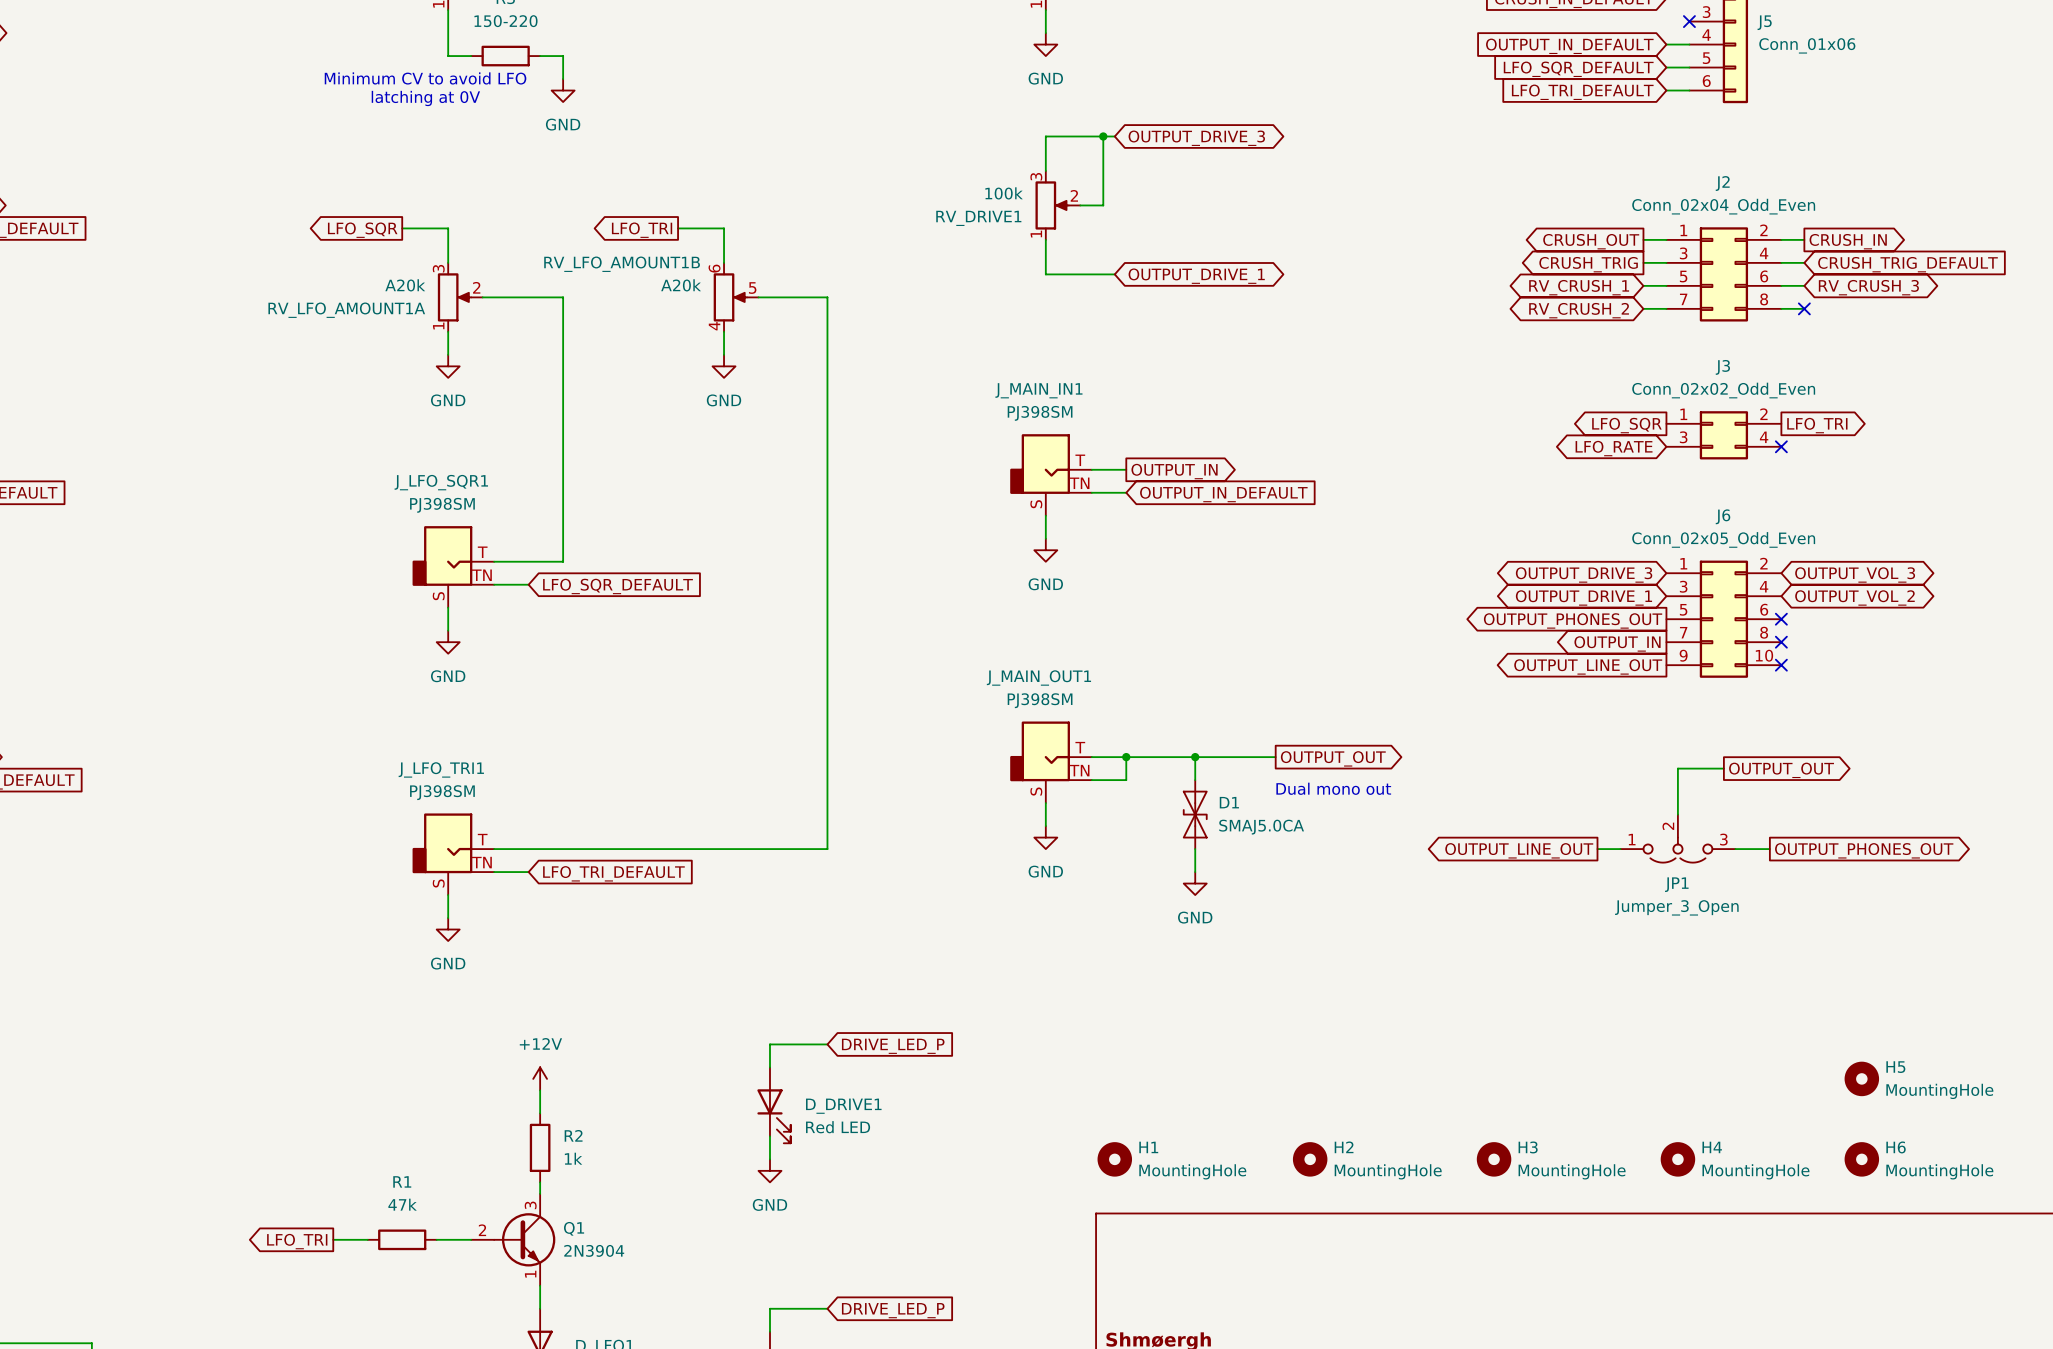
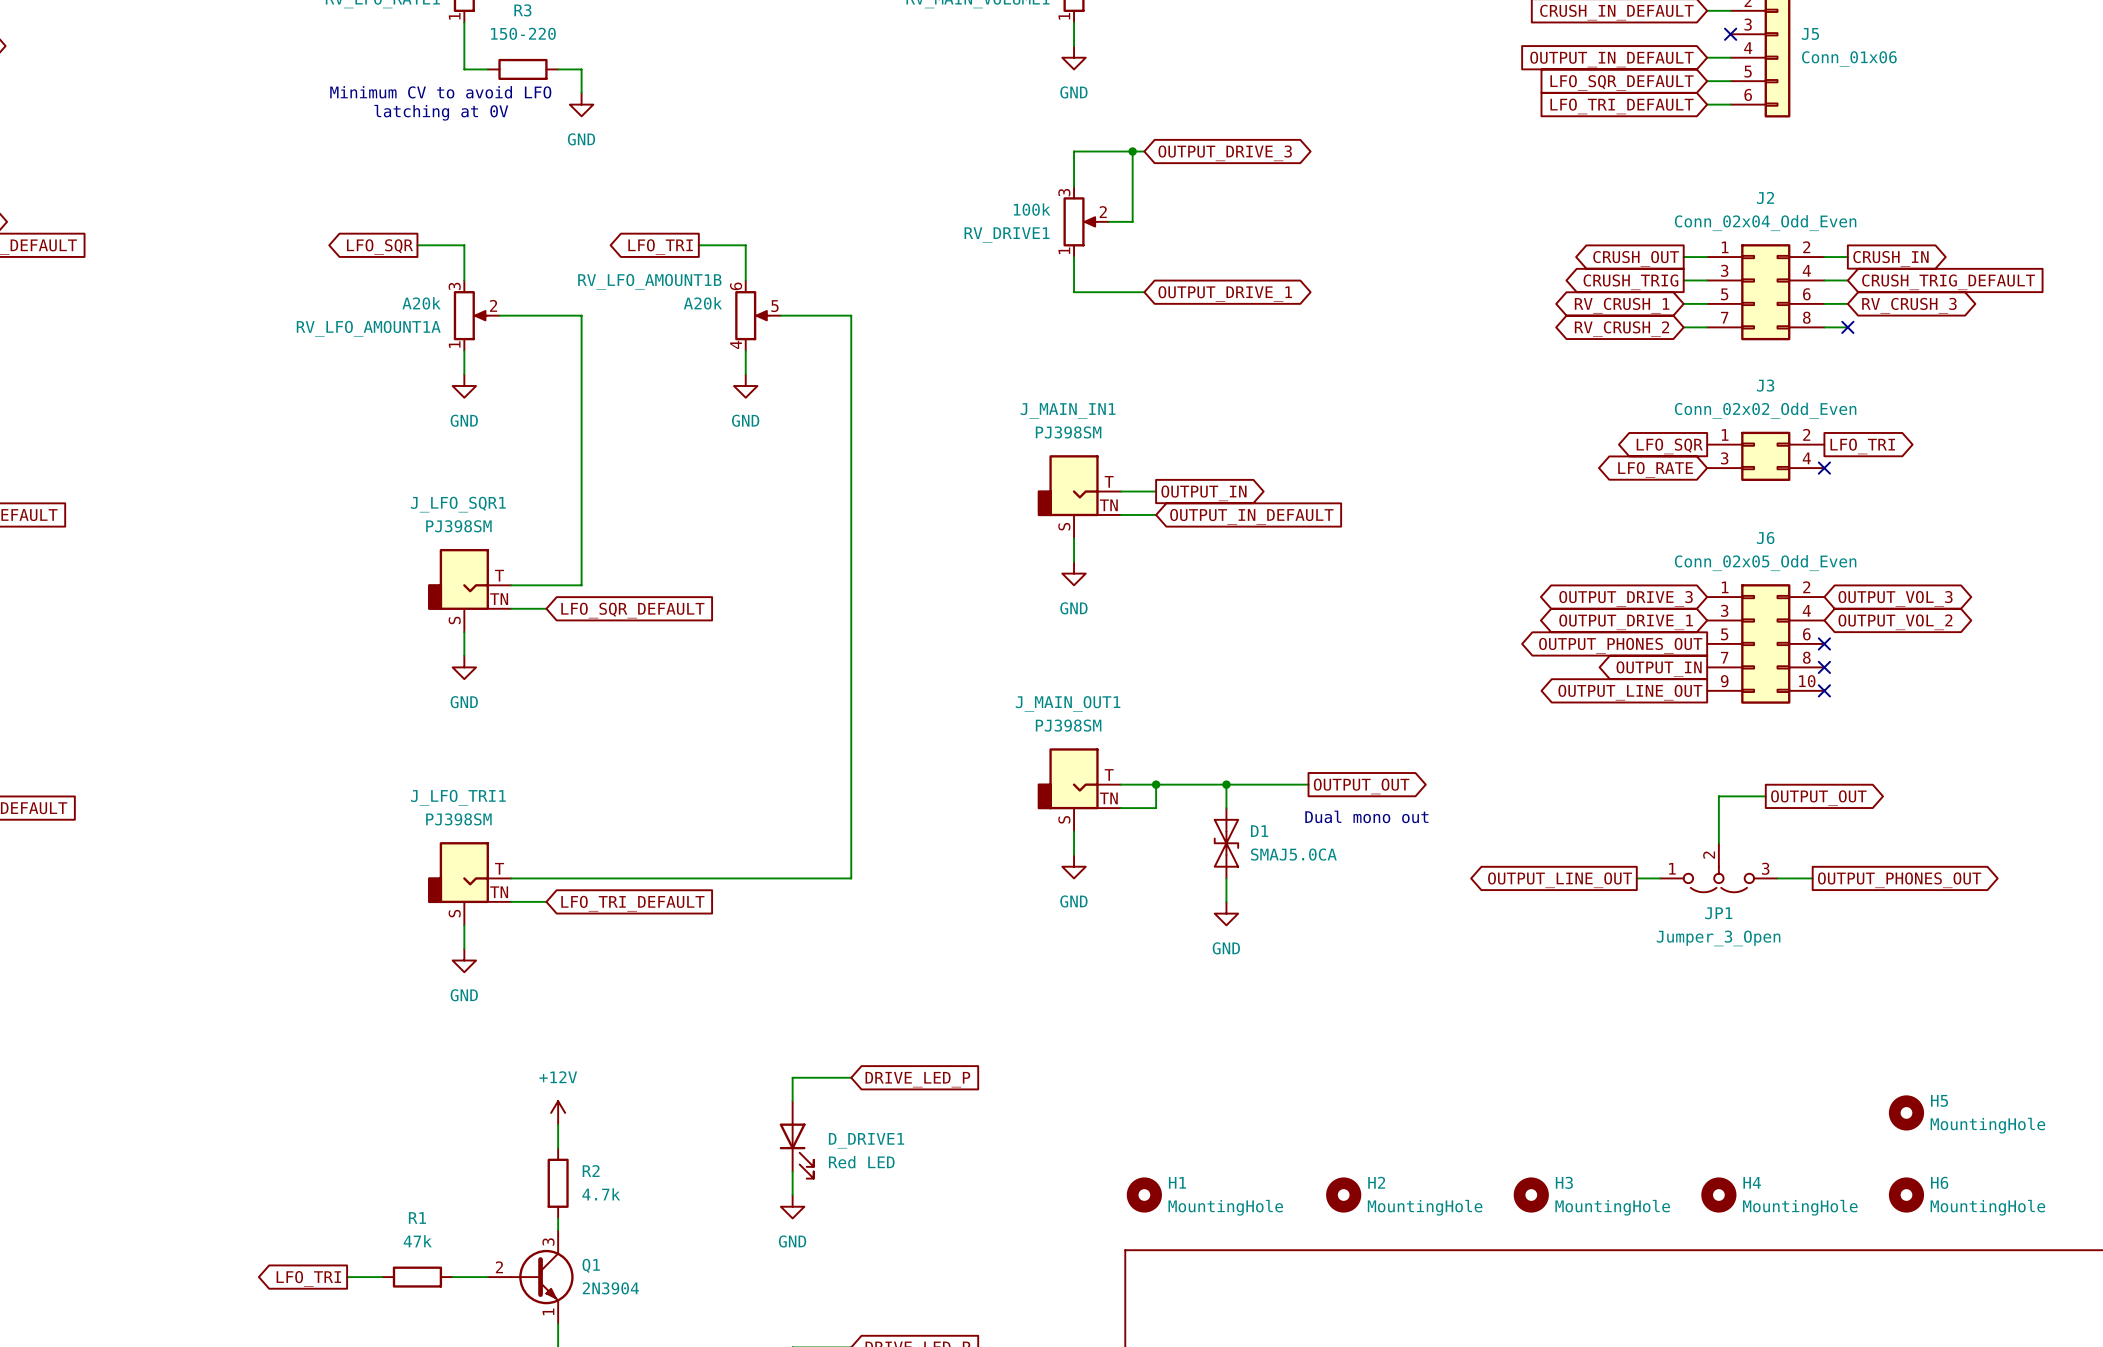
R2 value: 1k (573, 1158) -> 4.7k (601, 1194)

